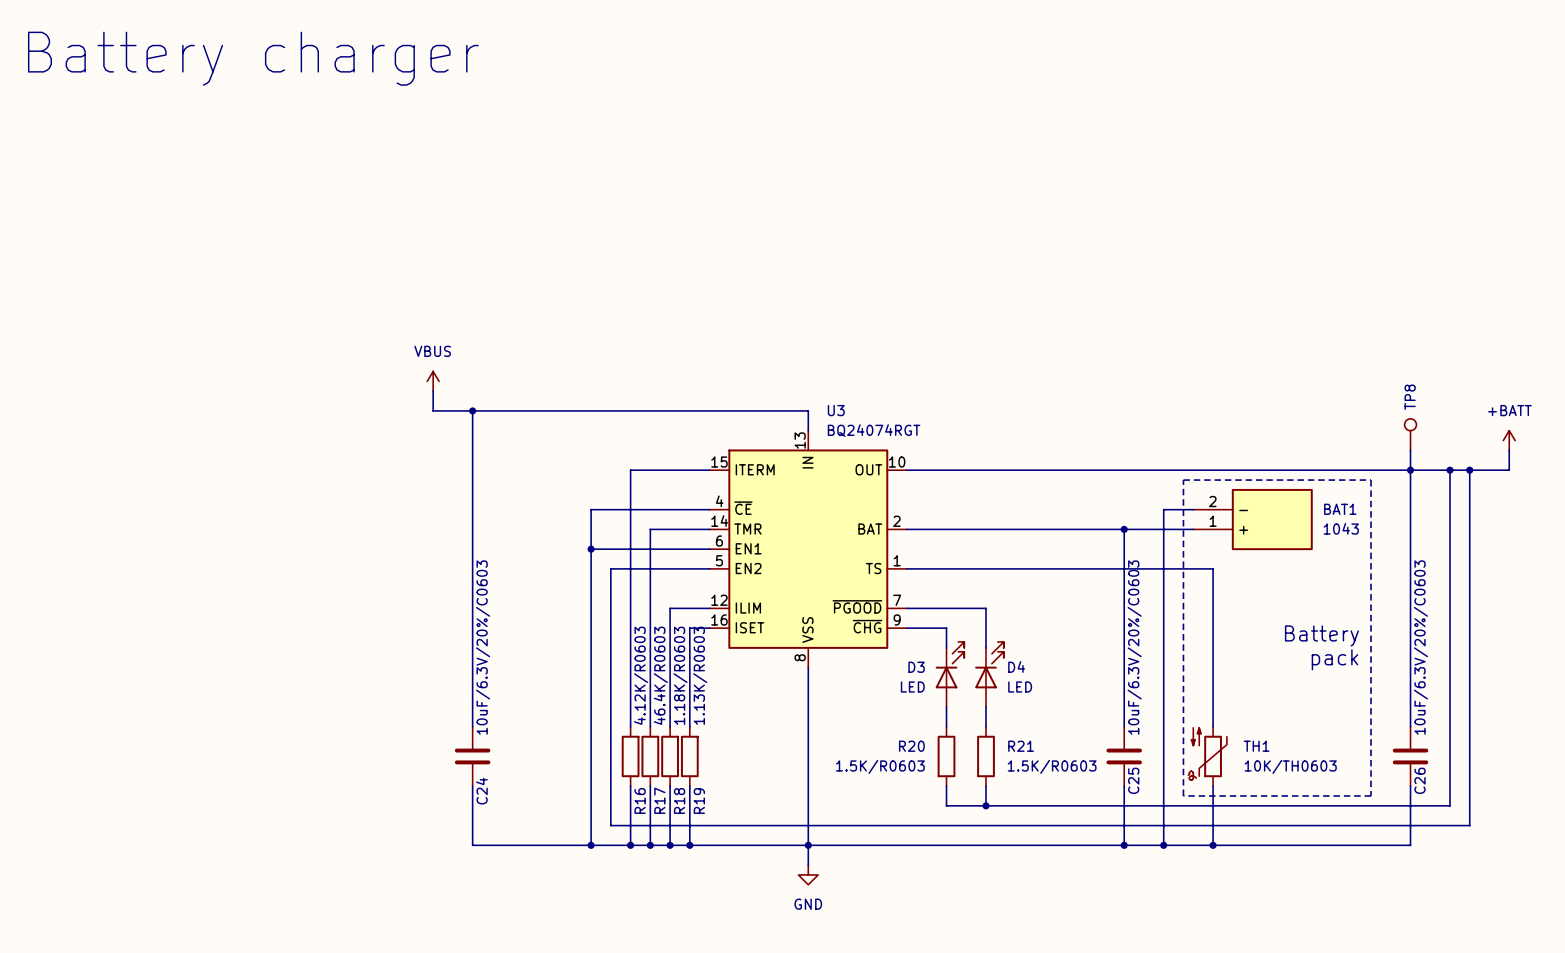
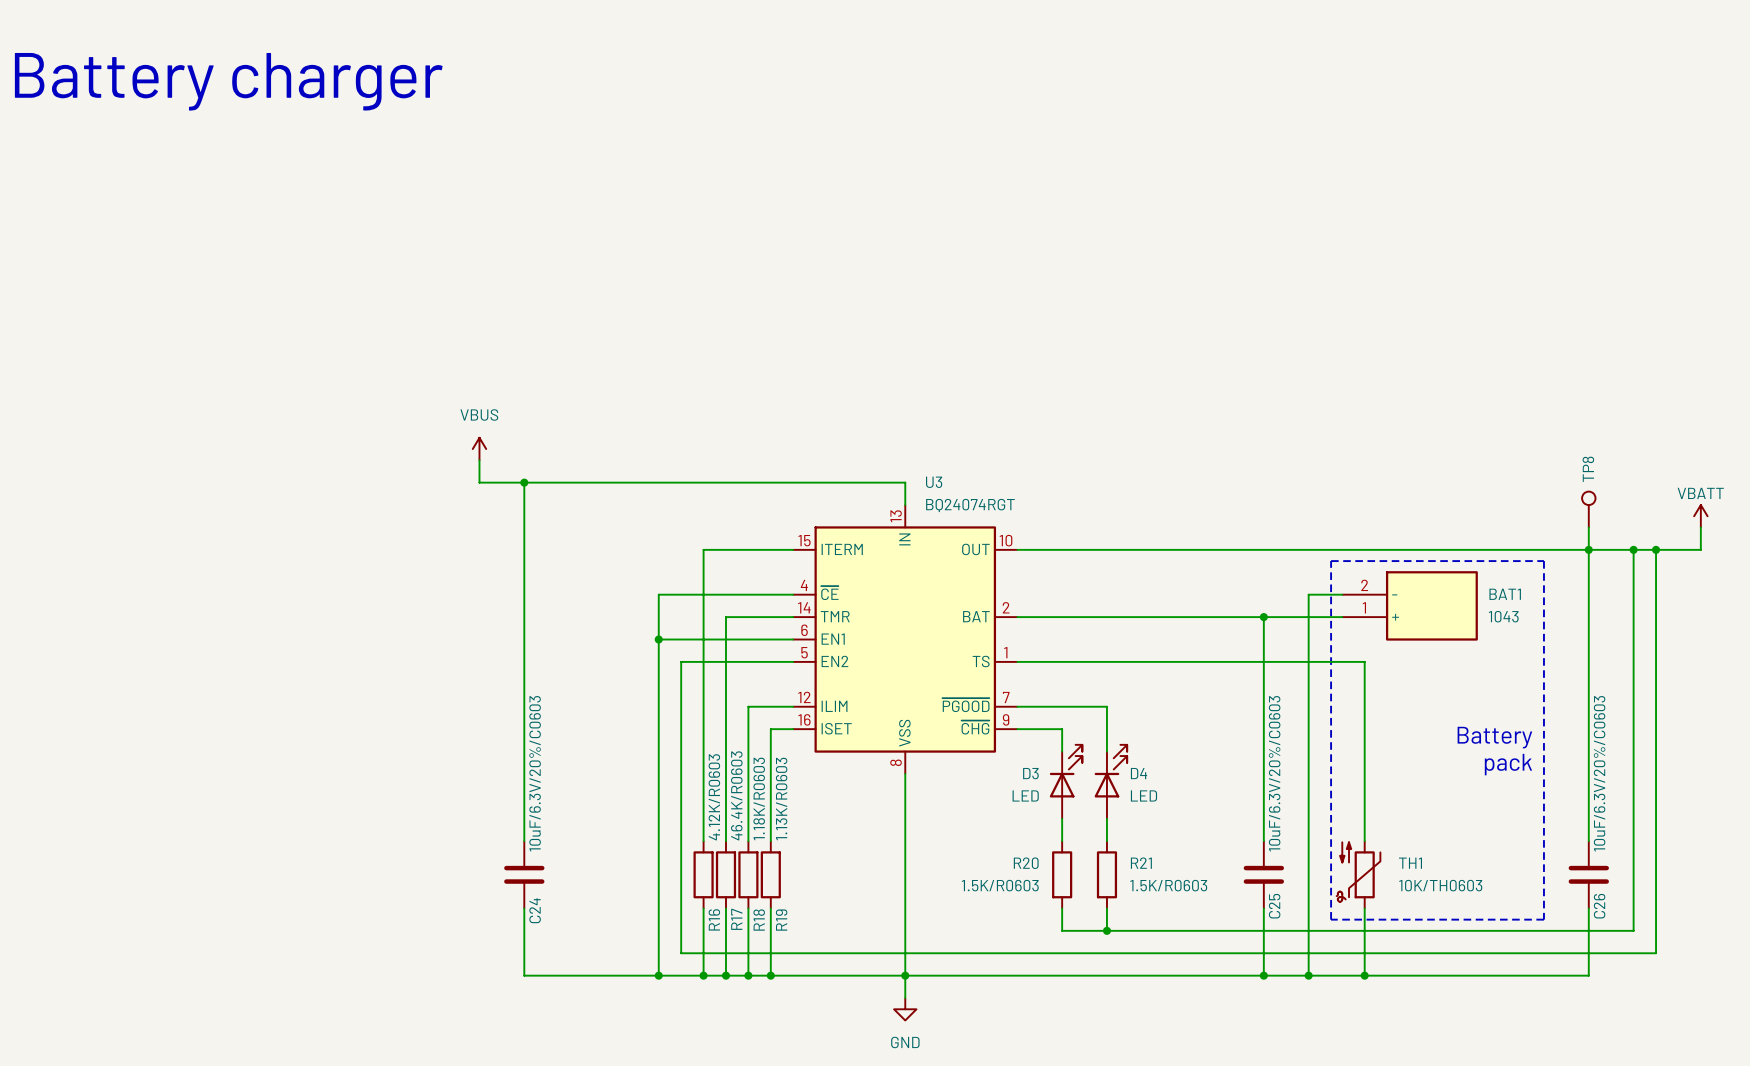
power symbol: +BATT (1509, 440) -> VBATT (1700, 516)

